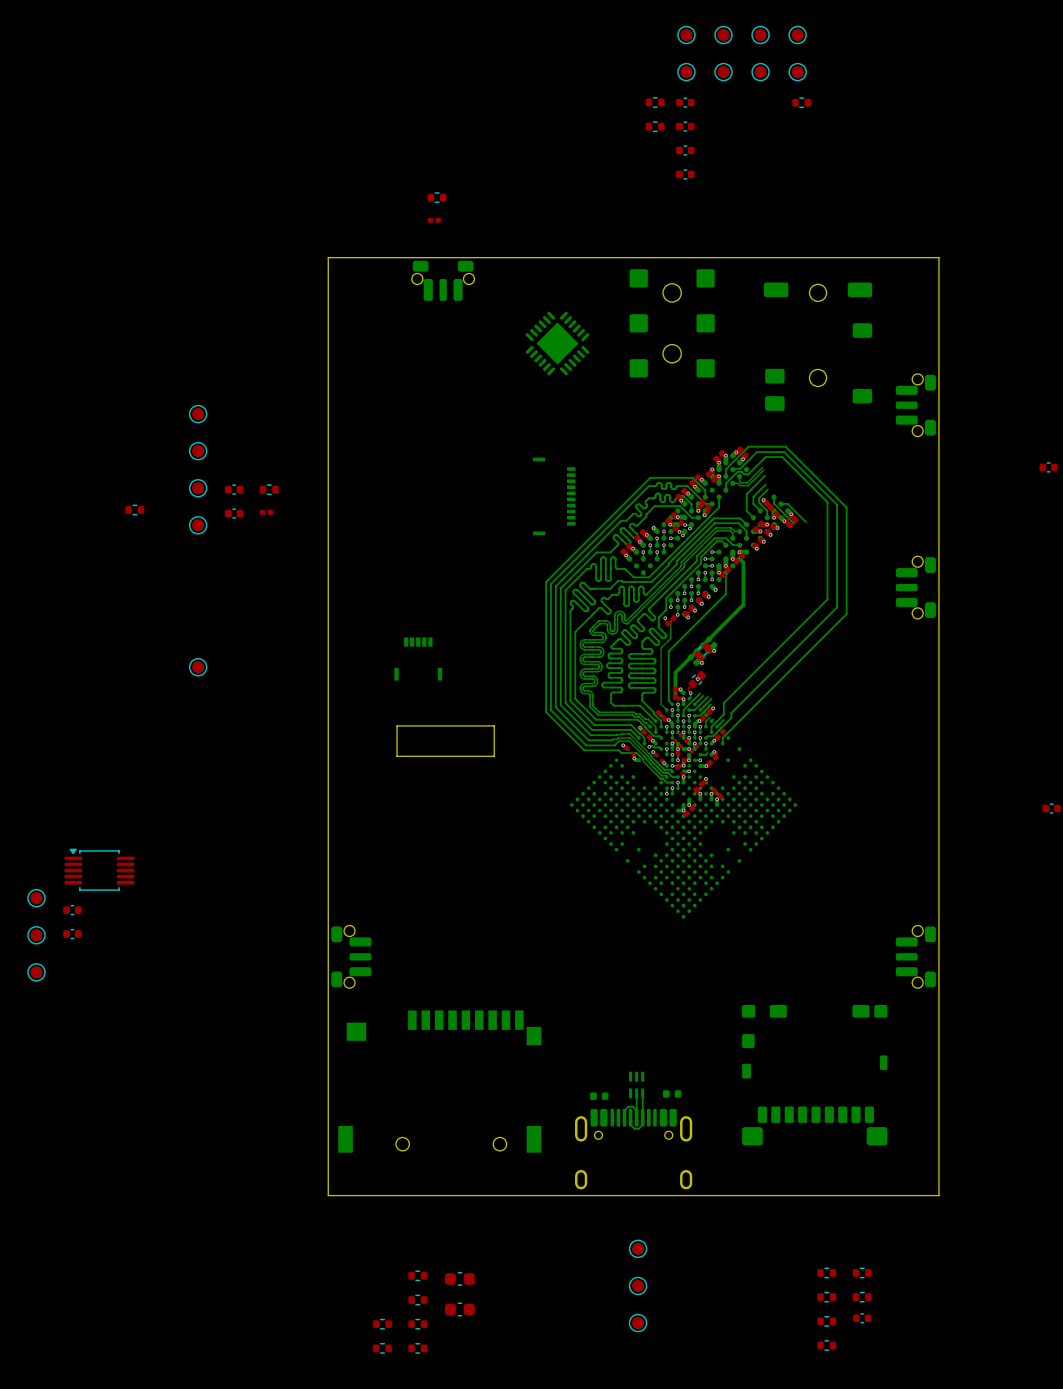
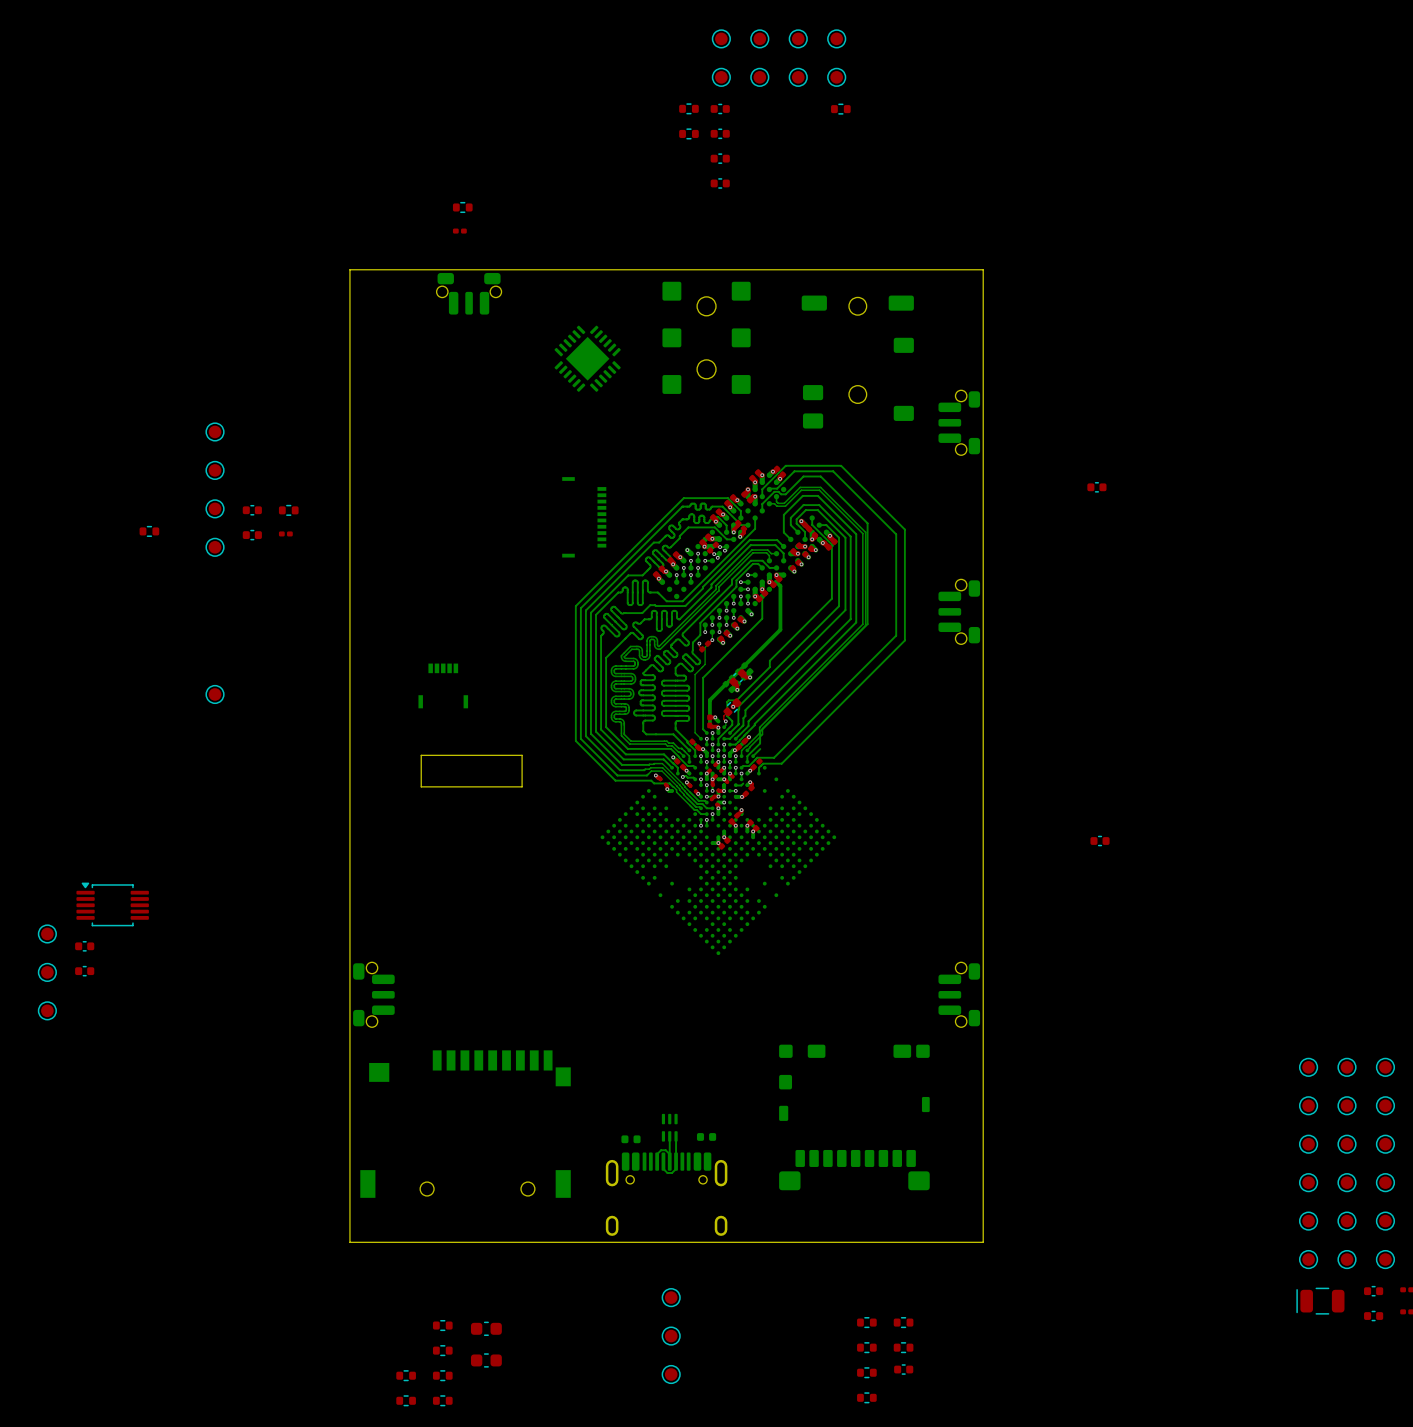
bottom track: (785, 446) (846, 507) (846, 613) (726, 733) -> (824, 465) (841, 465) (904, 529) (904, 640) (781, 763) (763, 763)
bottom track: (784, 452) (837, 504) (837, 607) (731, 712) (731, 717) (721, 728) -> (822, 471) (833, 471) (896, 534) (896, 635) (774, 757) (757, 757)
bottom track: none -> (800, 487) (820, 487) (865, 532) (865, 625) (762, 728) (762, 734) (749, 748)
bottom track: none -> (801, 490) (819, 490) (862, 533) (862, 624) (759, 727) (759, 733) (745, 746)
bottom track: none -> (802, 495) (817, 495) (856, 534) (856, 622) (746, 733)
bottom track: none -> (803, 505) (819, 505) (850, 536) (850, 619) (748, 721) (747, 727)
bottom track: none -> (805, 510) (817, 510) (845, 537) (845, 610) (745, 710) (743, 725)
bottom track: (799, 516) (805, 522) -> (839, 537) (839, 606) (739, 706) (738, 724)
bottom track: (700, 693) (696, 696) -> (831, 544) (831, 598) (769, 660) (769, 667) (736, 700) (727, 701) (727, 716) (732, 721) (732, 724)

